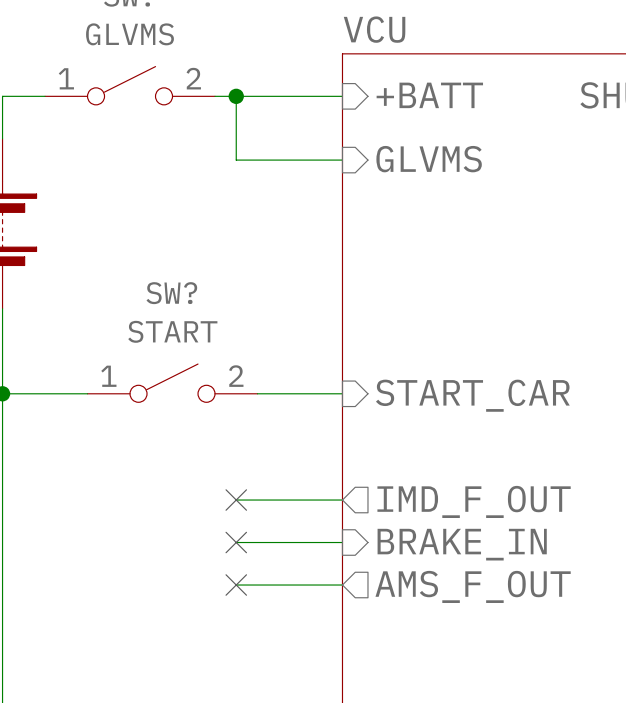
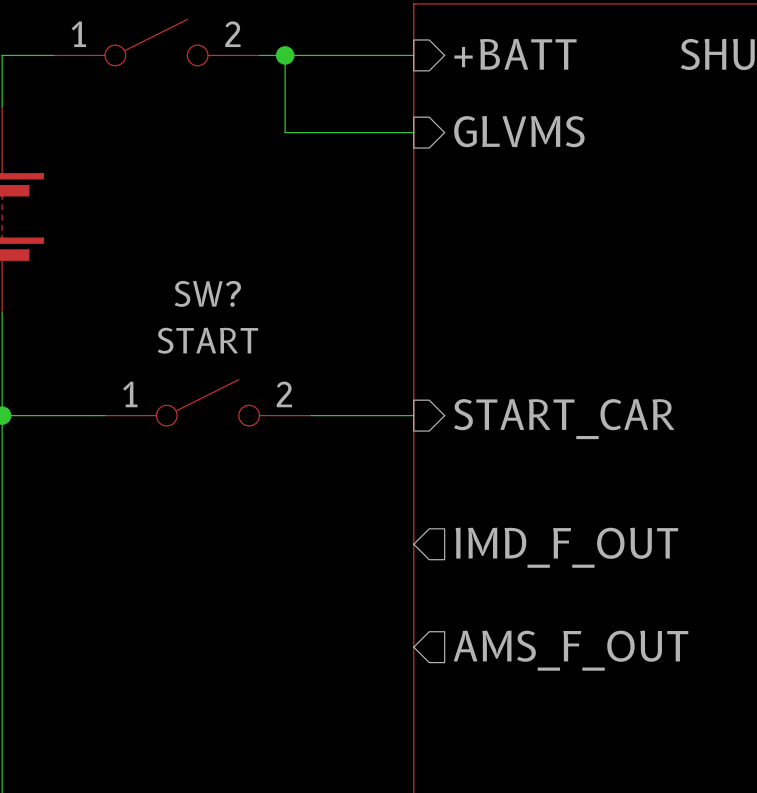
wire: (236, 500) (342, 500) -> none
no-connect mark: (236, 500) -> none
wire: (236, 542) (342, 542) -> none
no-connect mark: (236, 542) -> none
sheet pin: BRAKE_IN (462, 544) -> none
wire: (236, 585) (342, 585) -> none
no-connect mark: (236, 585) -> none

